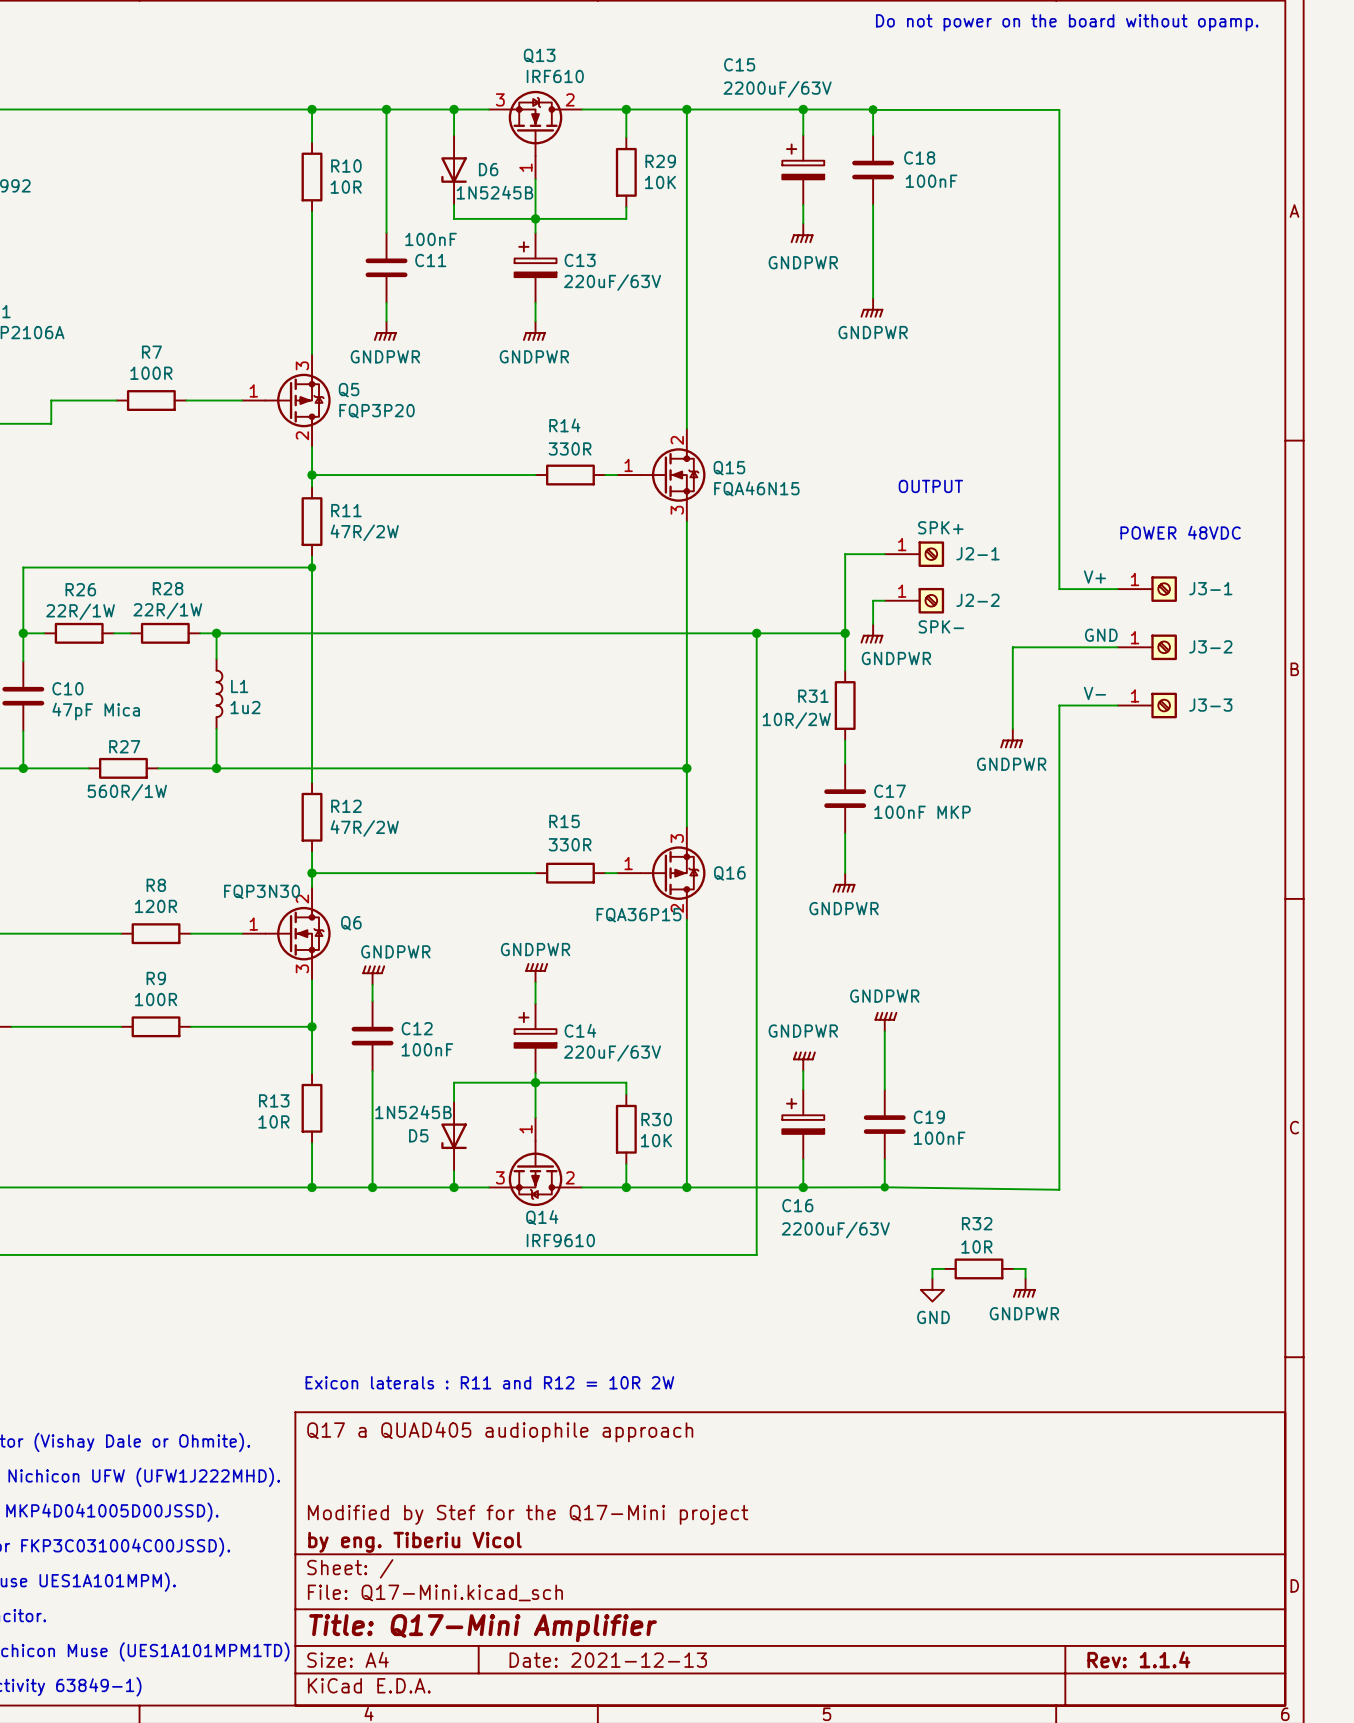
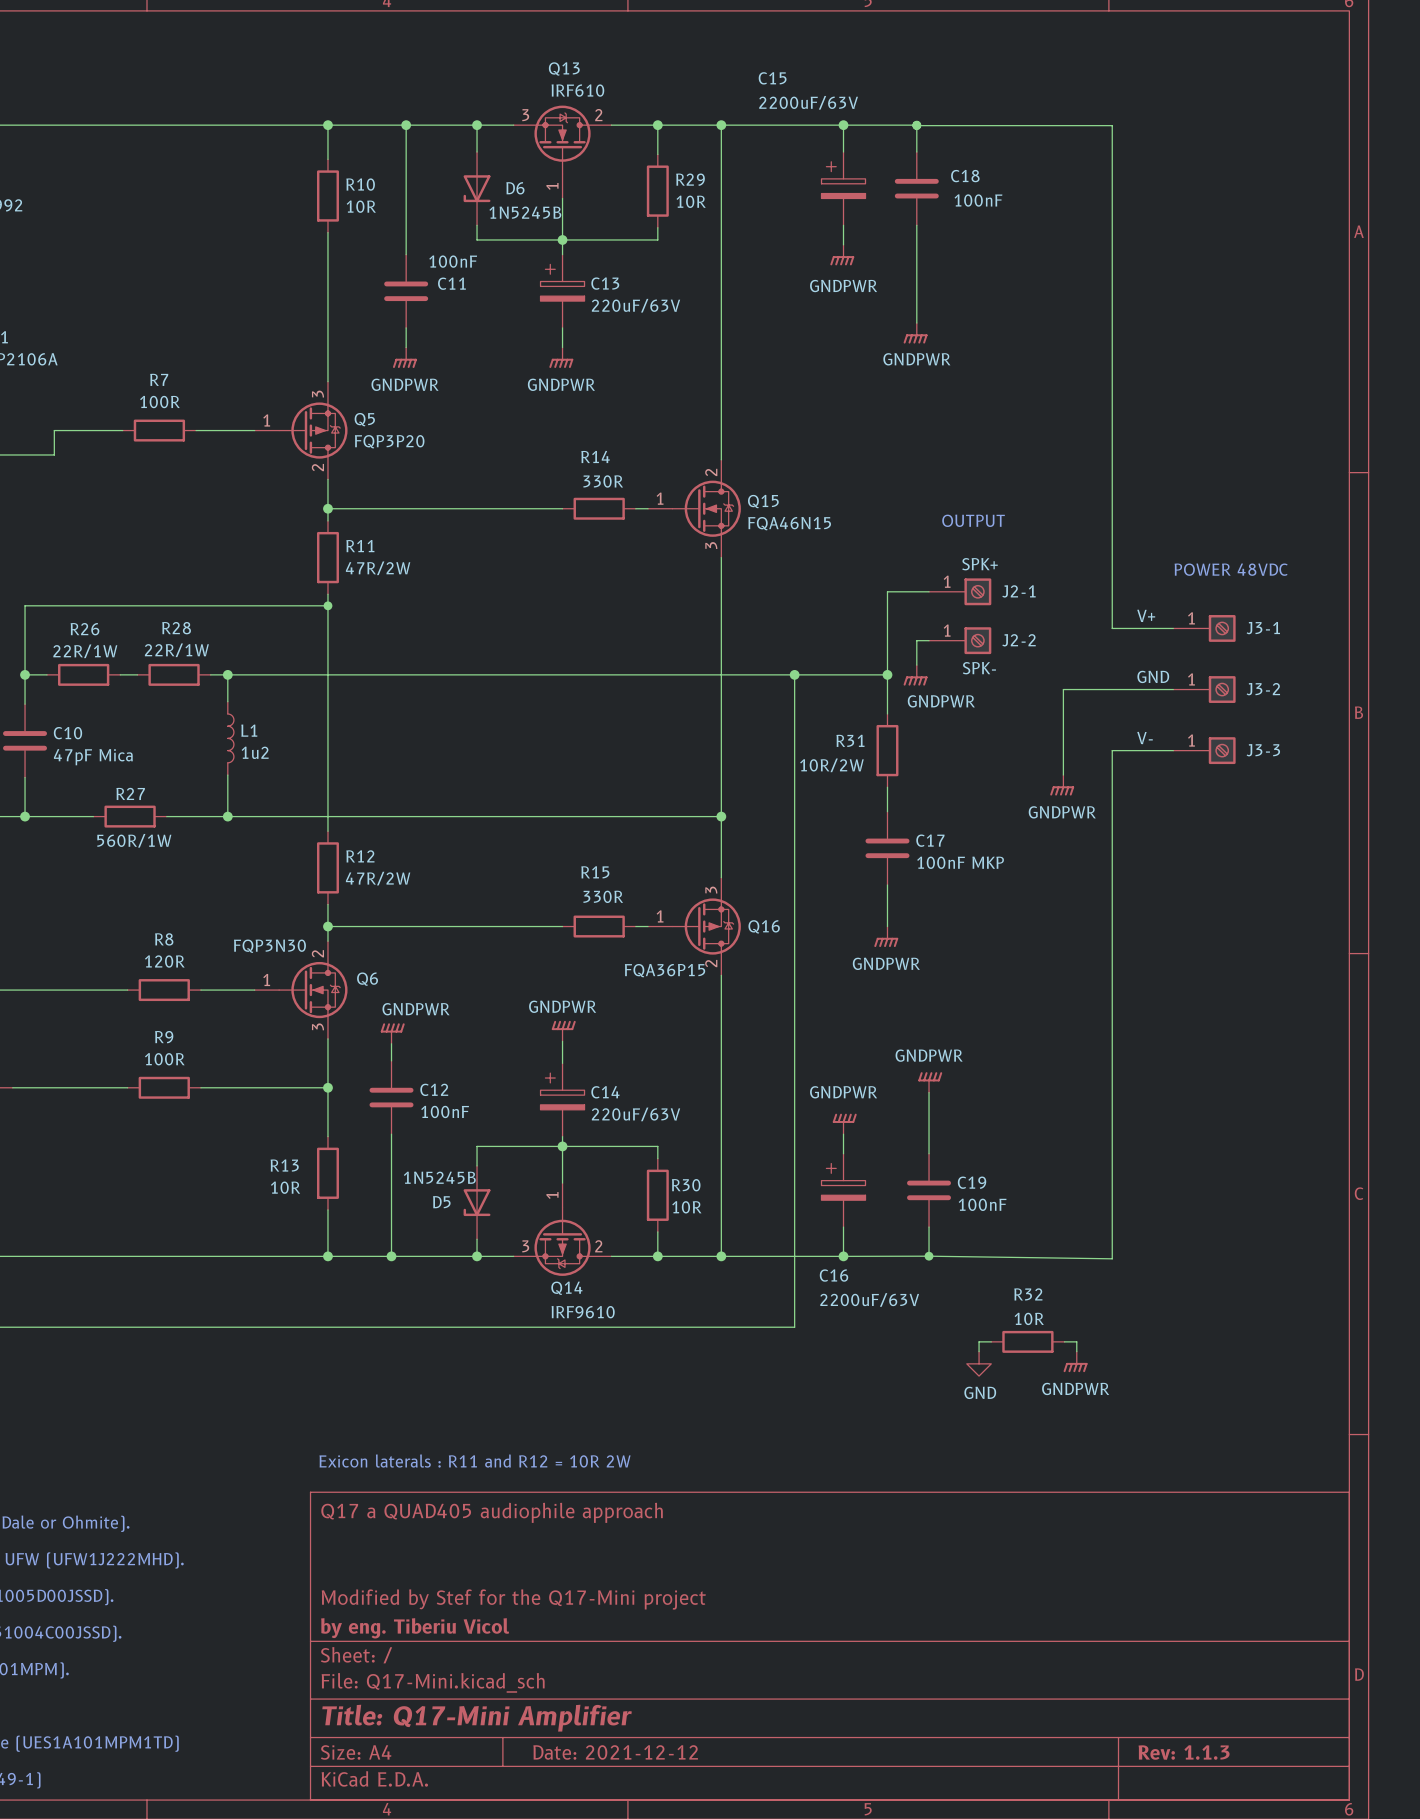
text: Do not power on the board without opamp. (1067, 22) -> none
R29 value: 10K (660, 182) -> 10R (691, 201)
R30 value: 10K (656, 1140) -> 10R (686, 1207)
title block: Rev: 1.1.4 (1138, 1659) -> Rev: 1.1.3 (1184, 1752)
title block: Date: 2021-12-13 (608, 1660) -> Date: 2021-12-12 (615, 1752)

